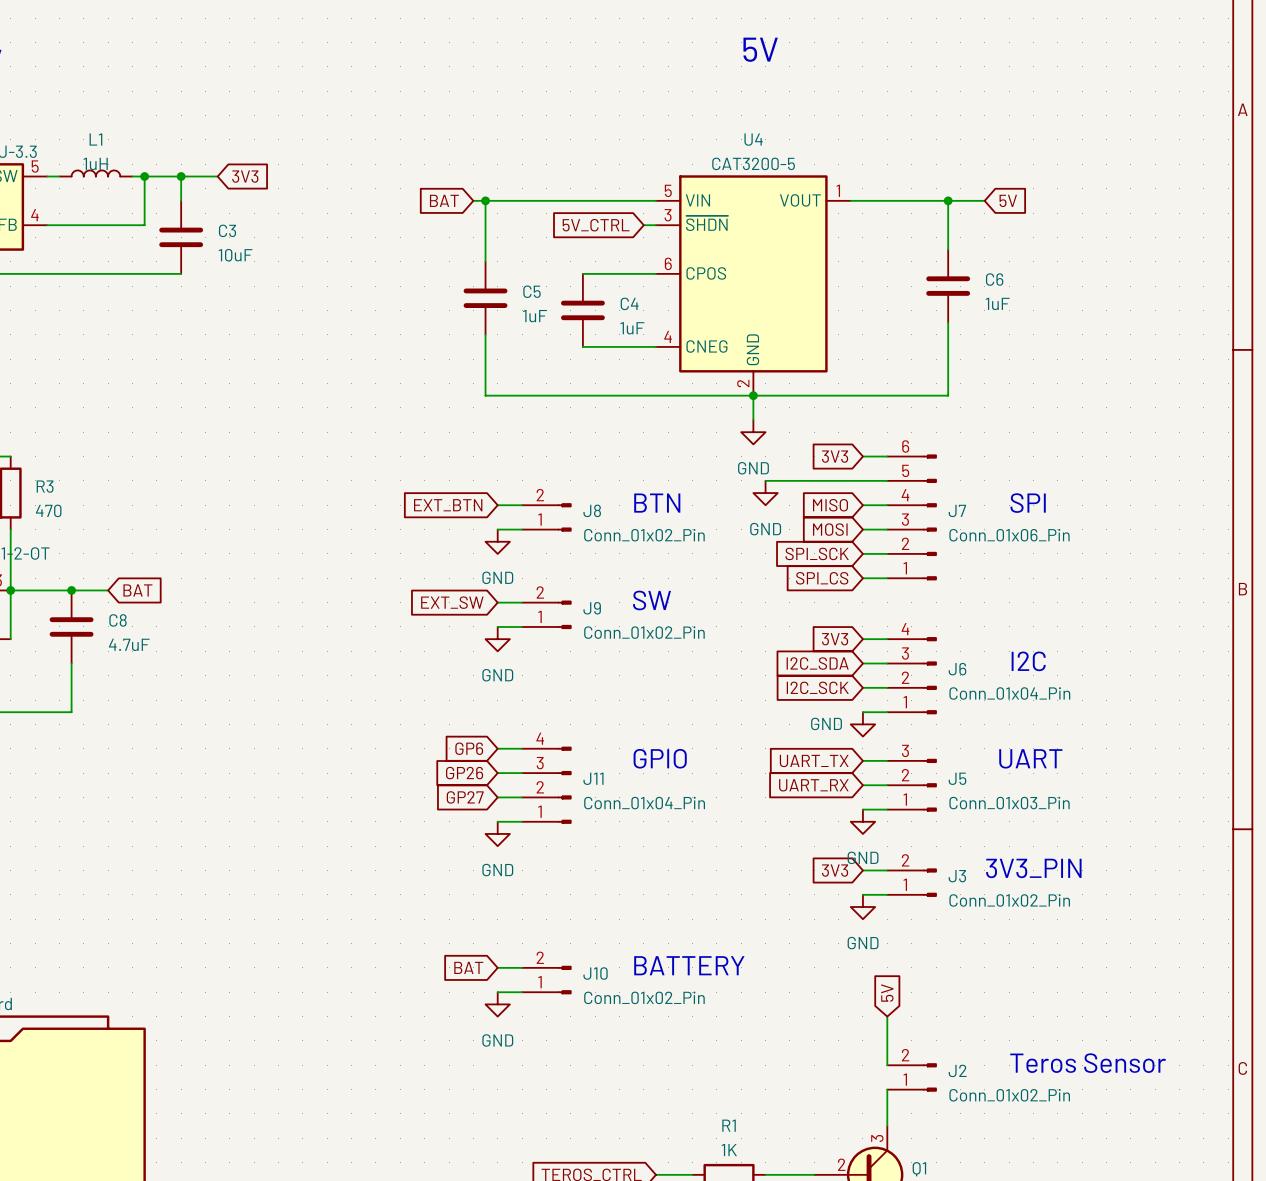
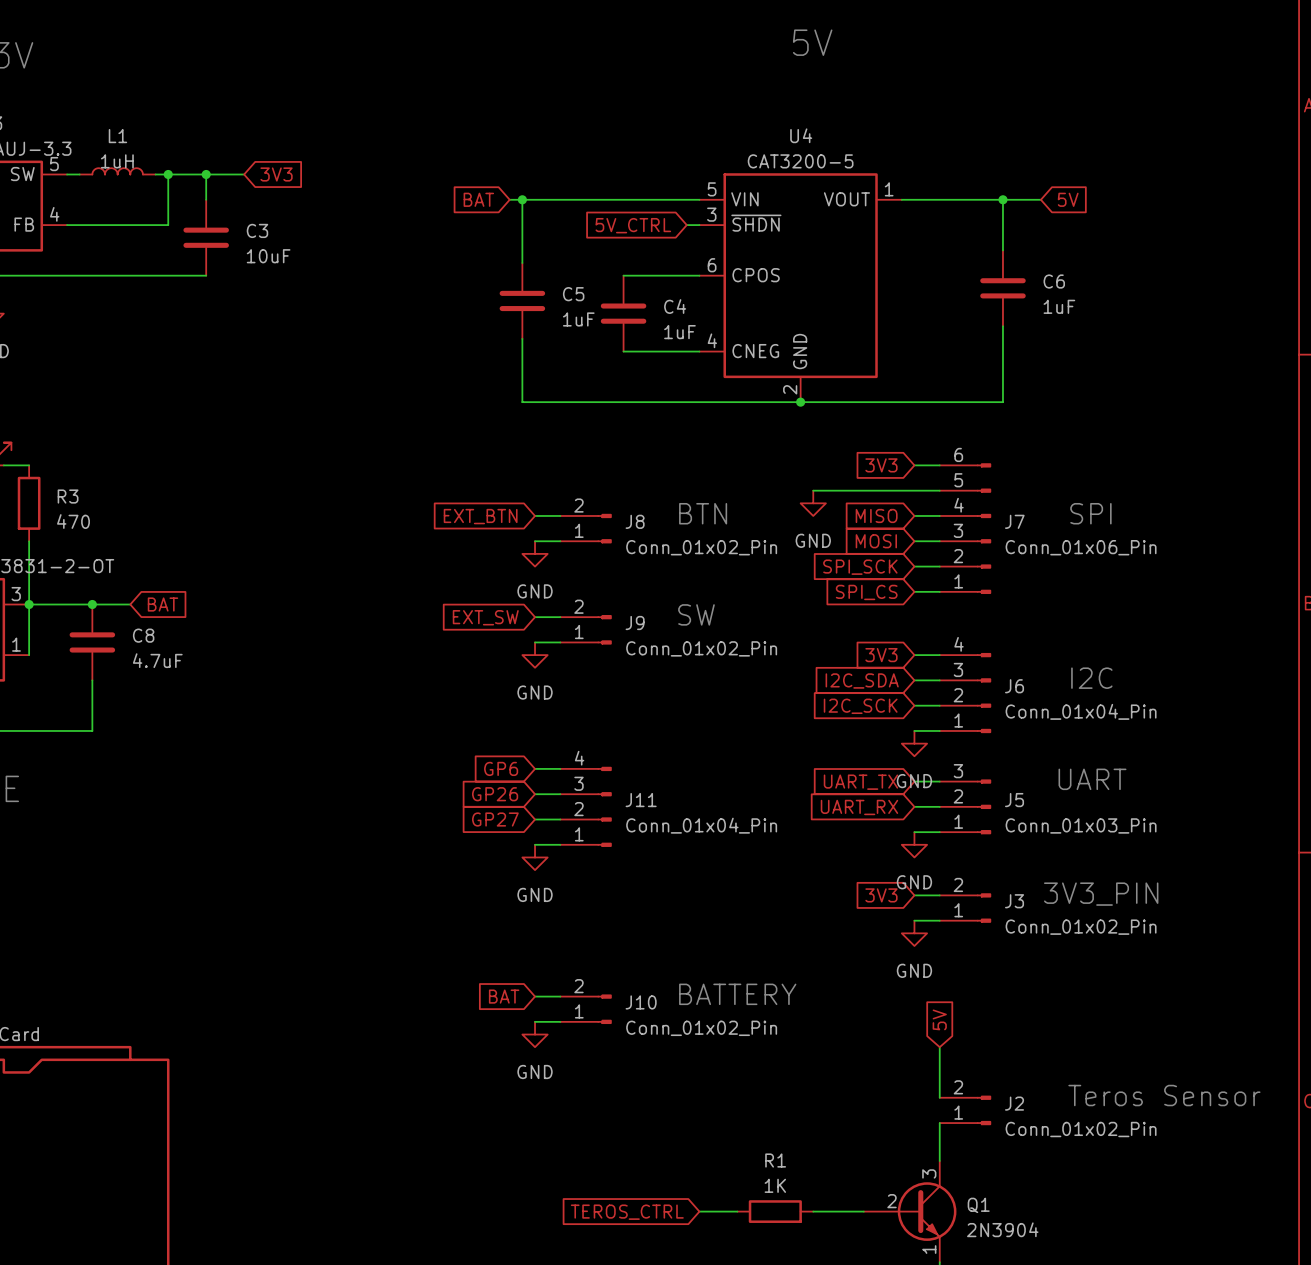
wire: (753, 395) (753, 420) -> none
power symbol: GND (753, 432) -> none
power symbol text position: GND (826, 723) -> GND (914, 781)
text: GPIO (660, 758) -> none

